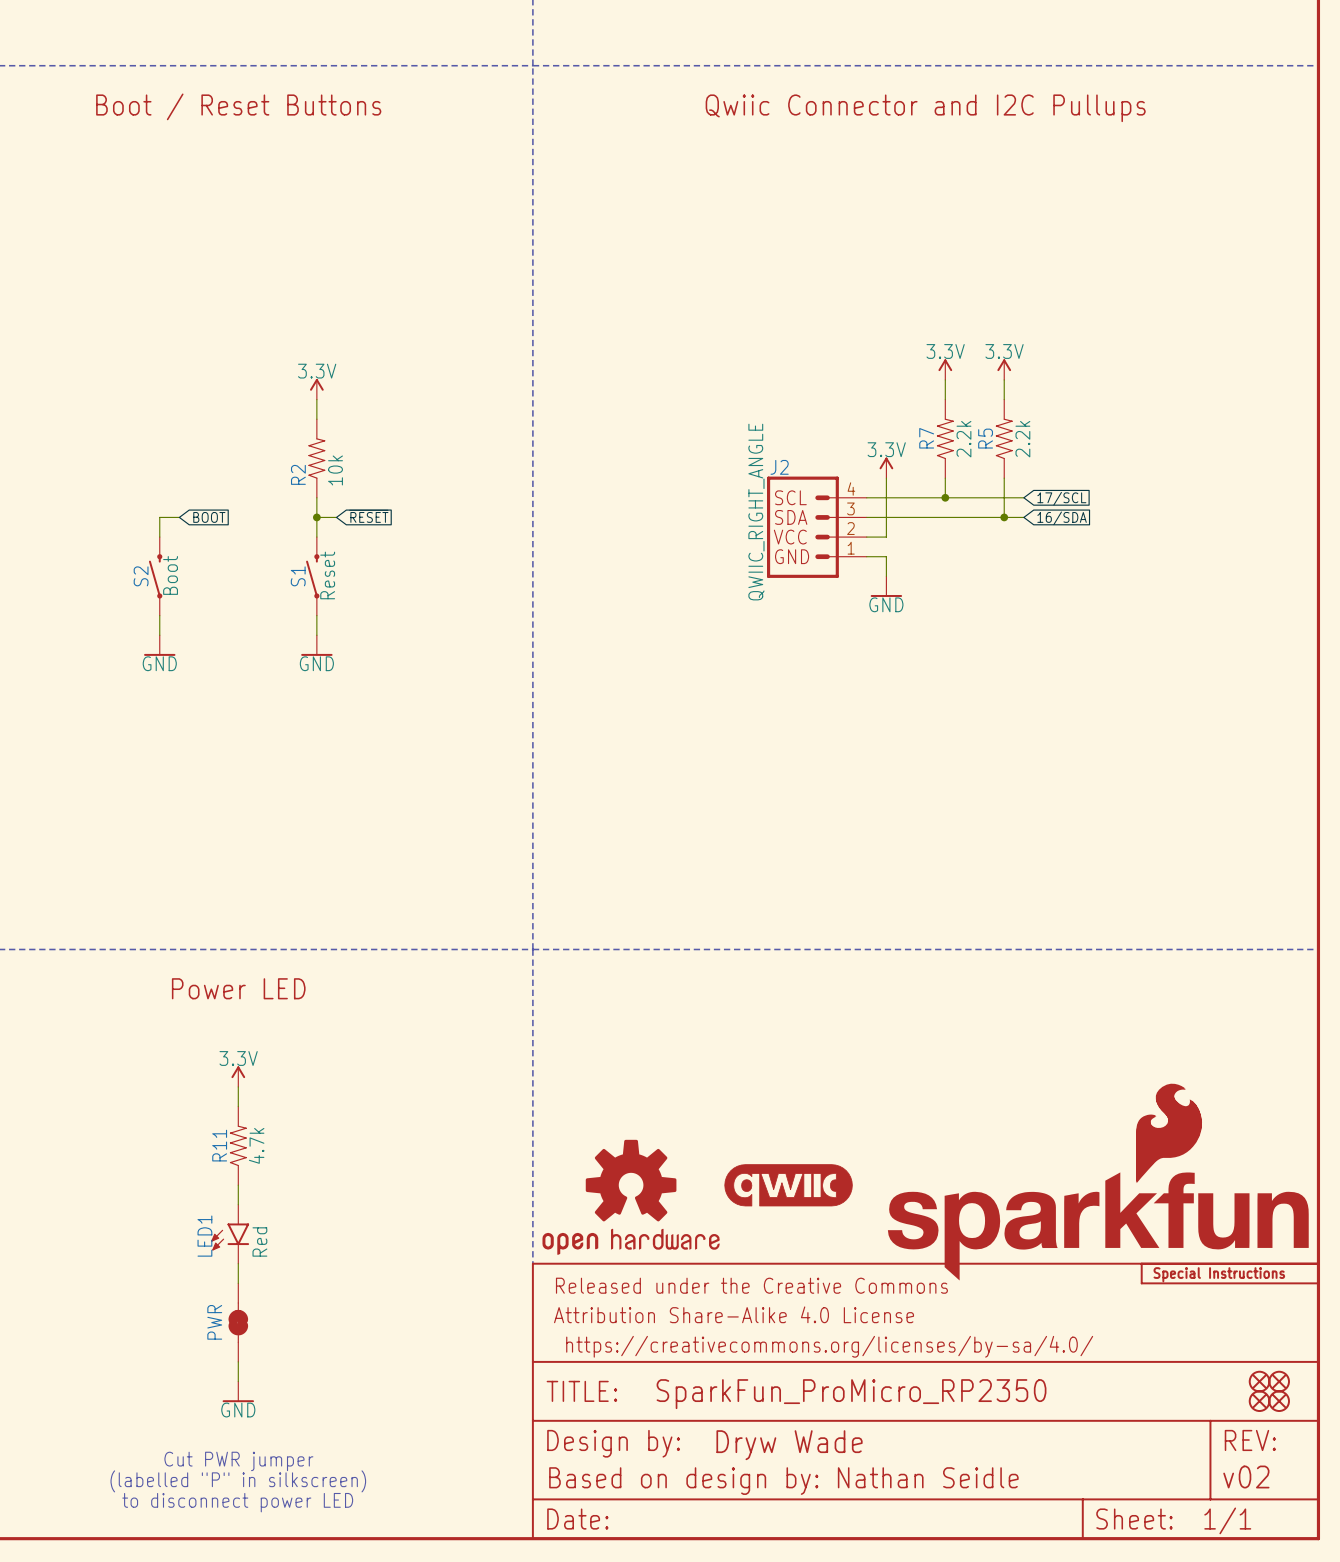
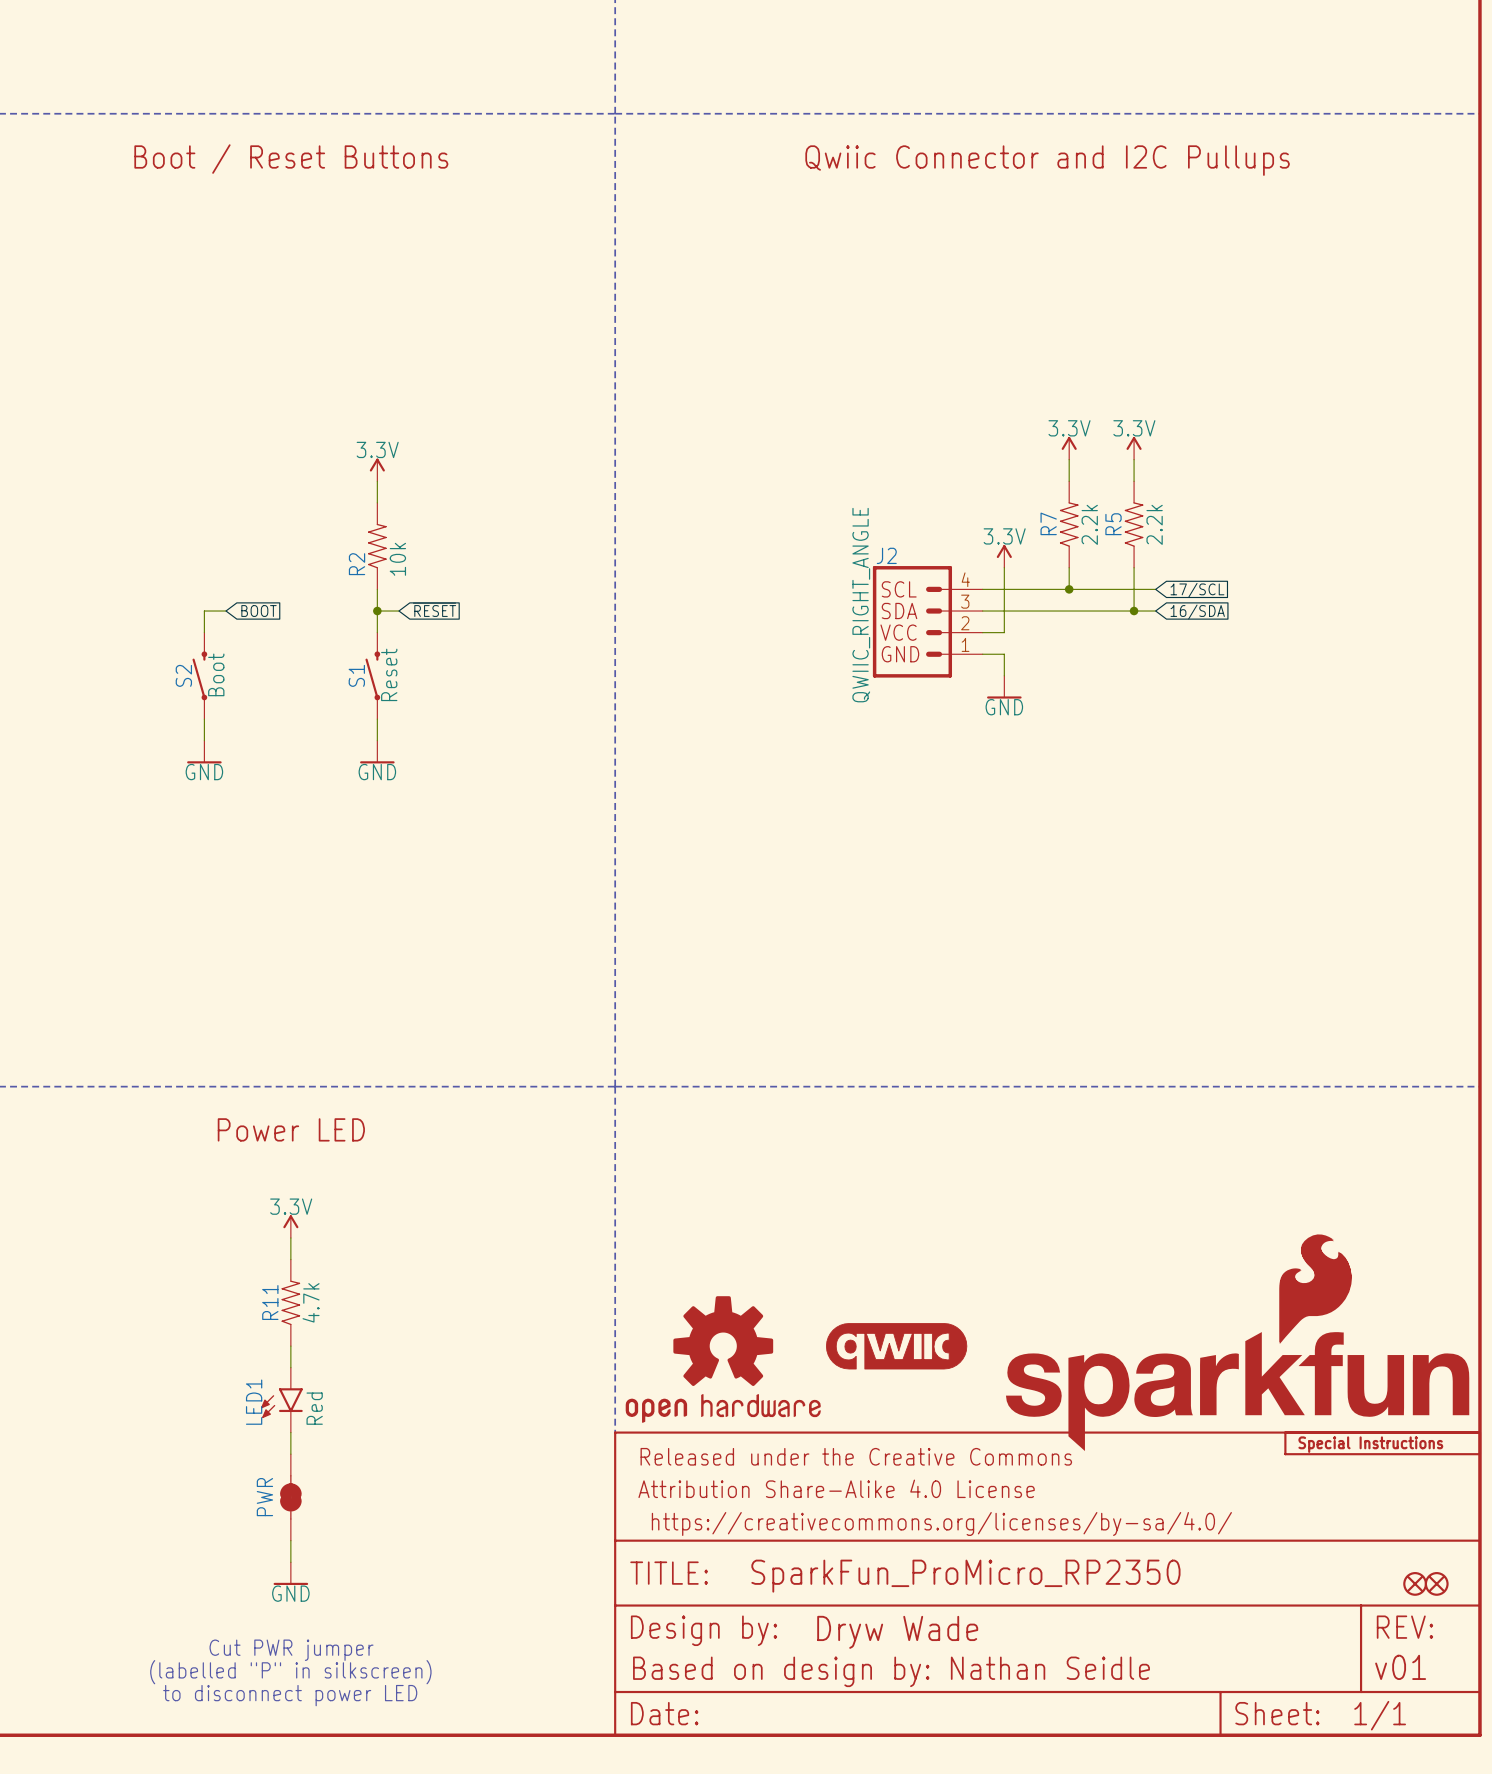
part: (1259, 1381) -> none
part: (1279, 1381) -> none
part text: v02 (1246, 1477) -> v01 (1400, 1667)

